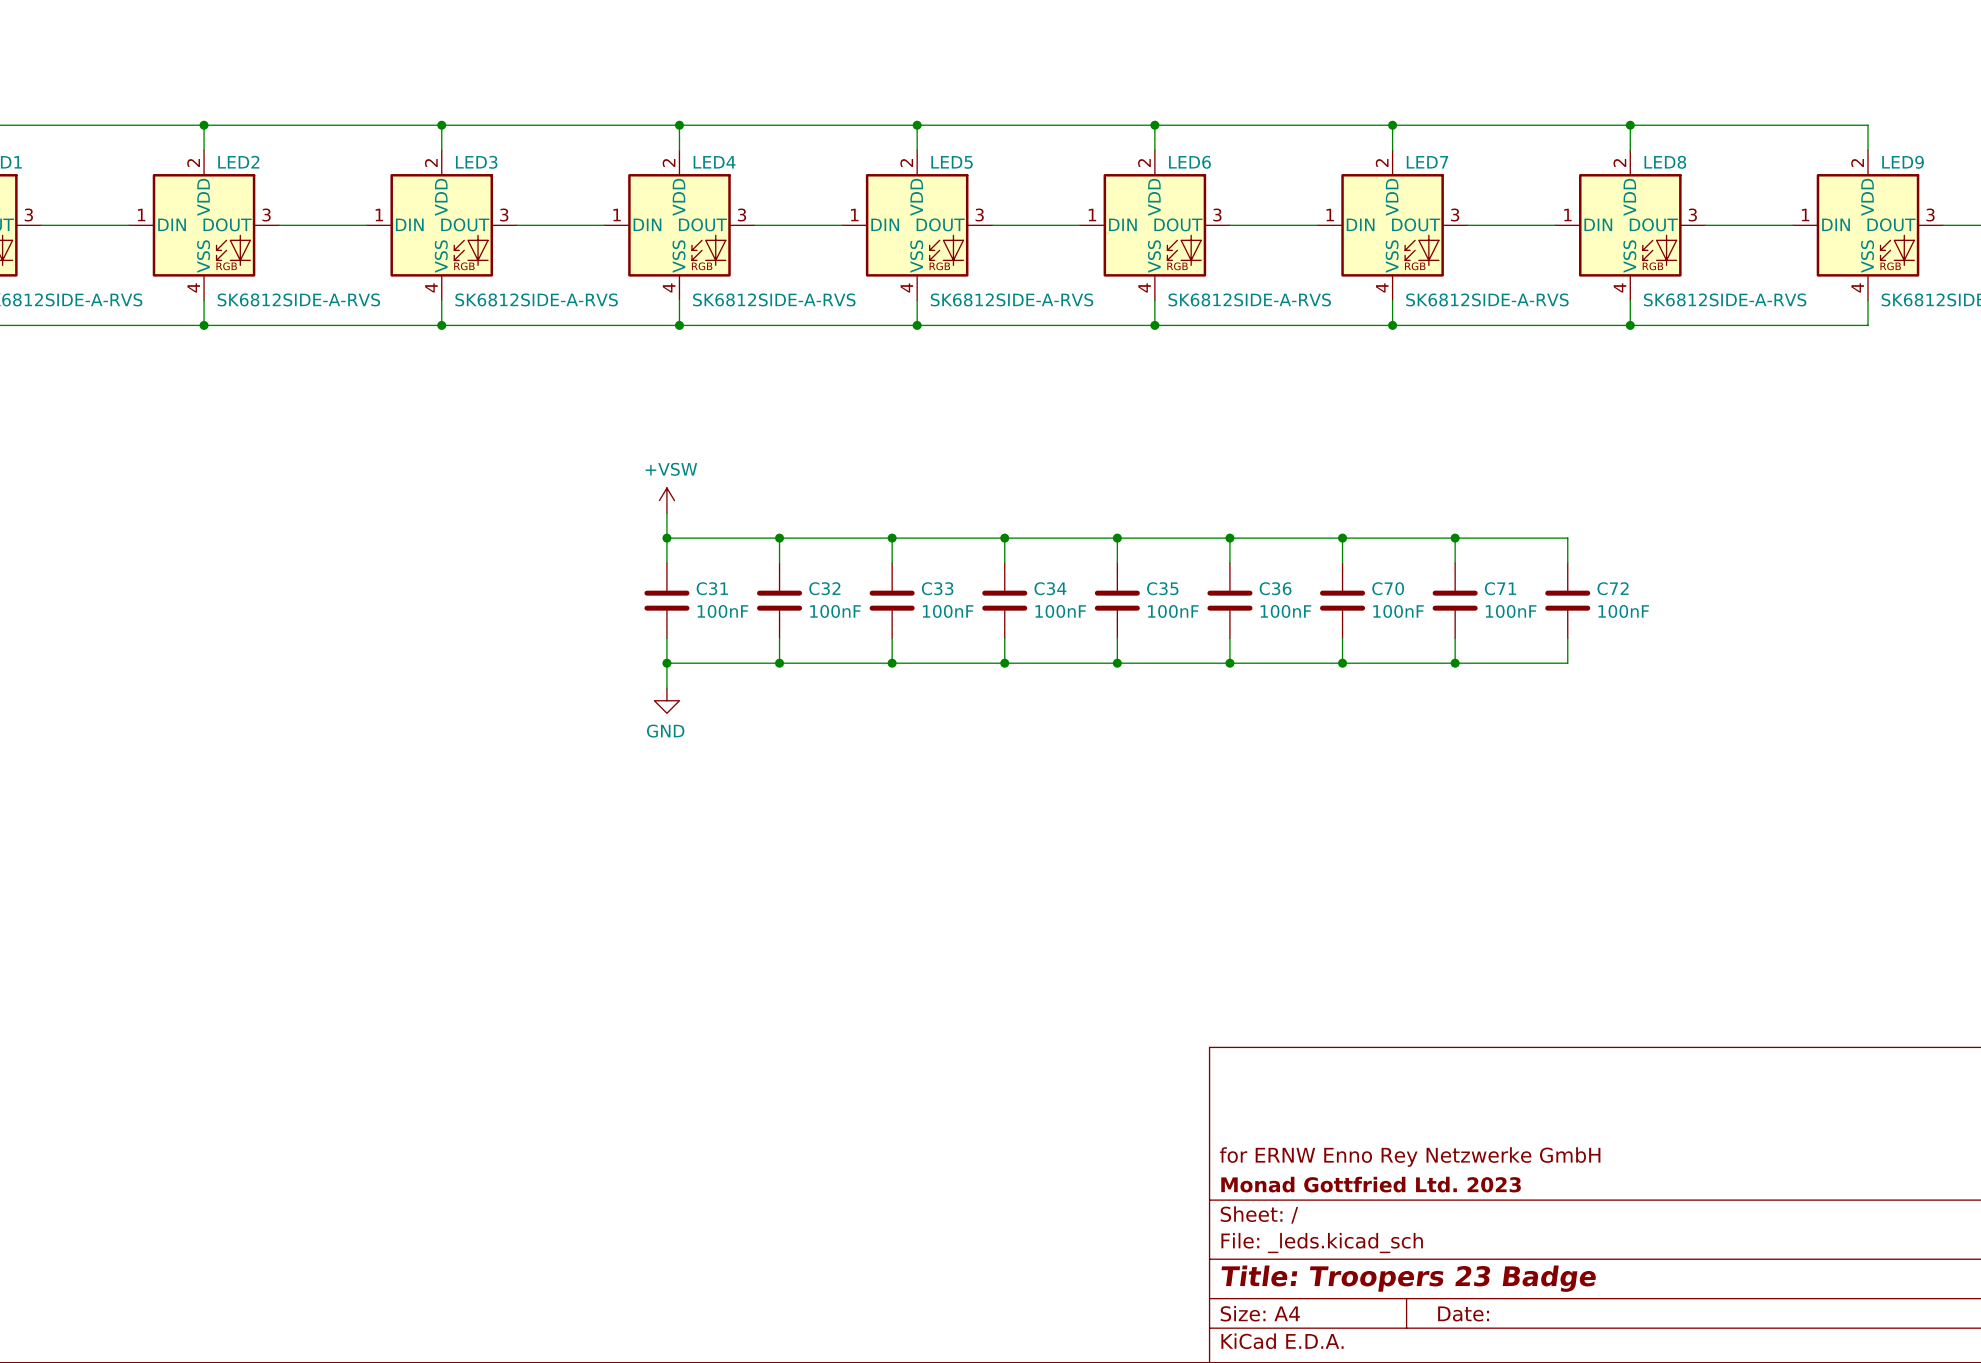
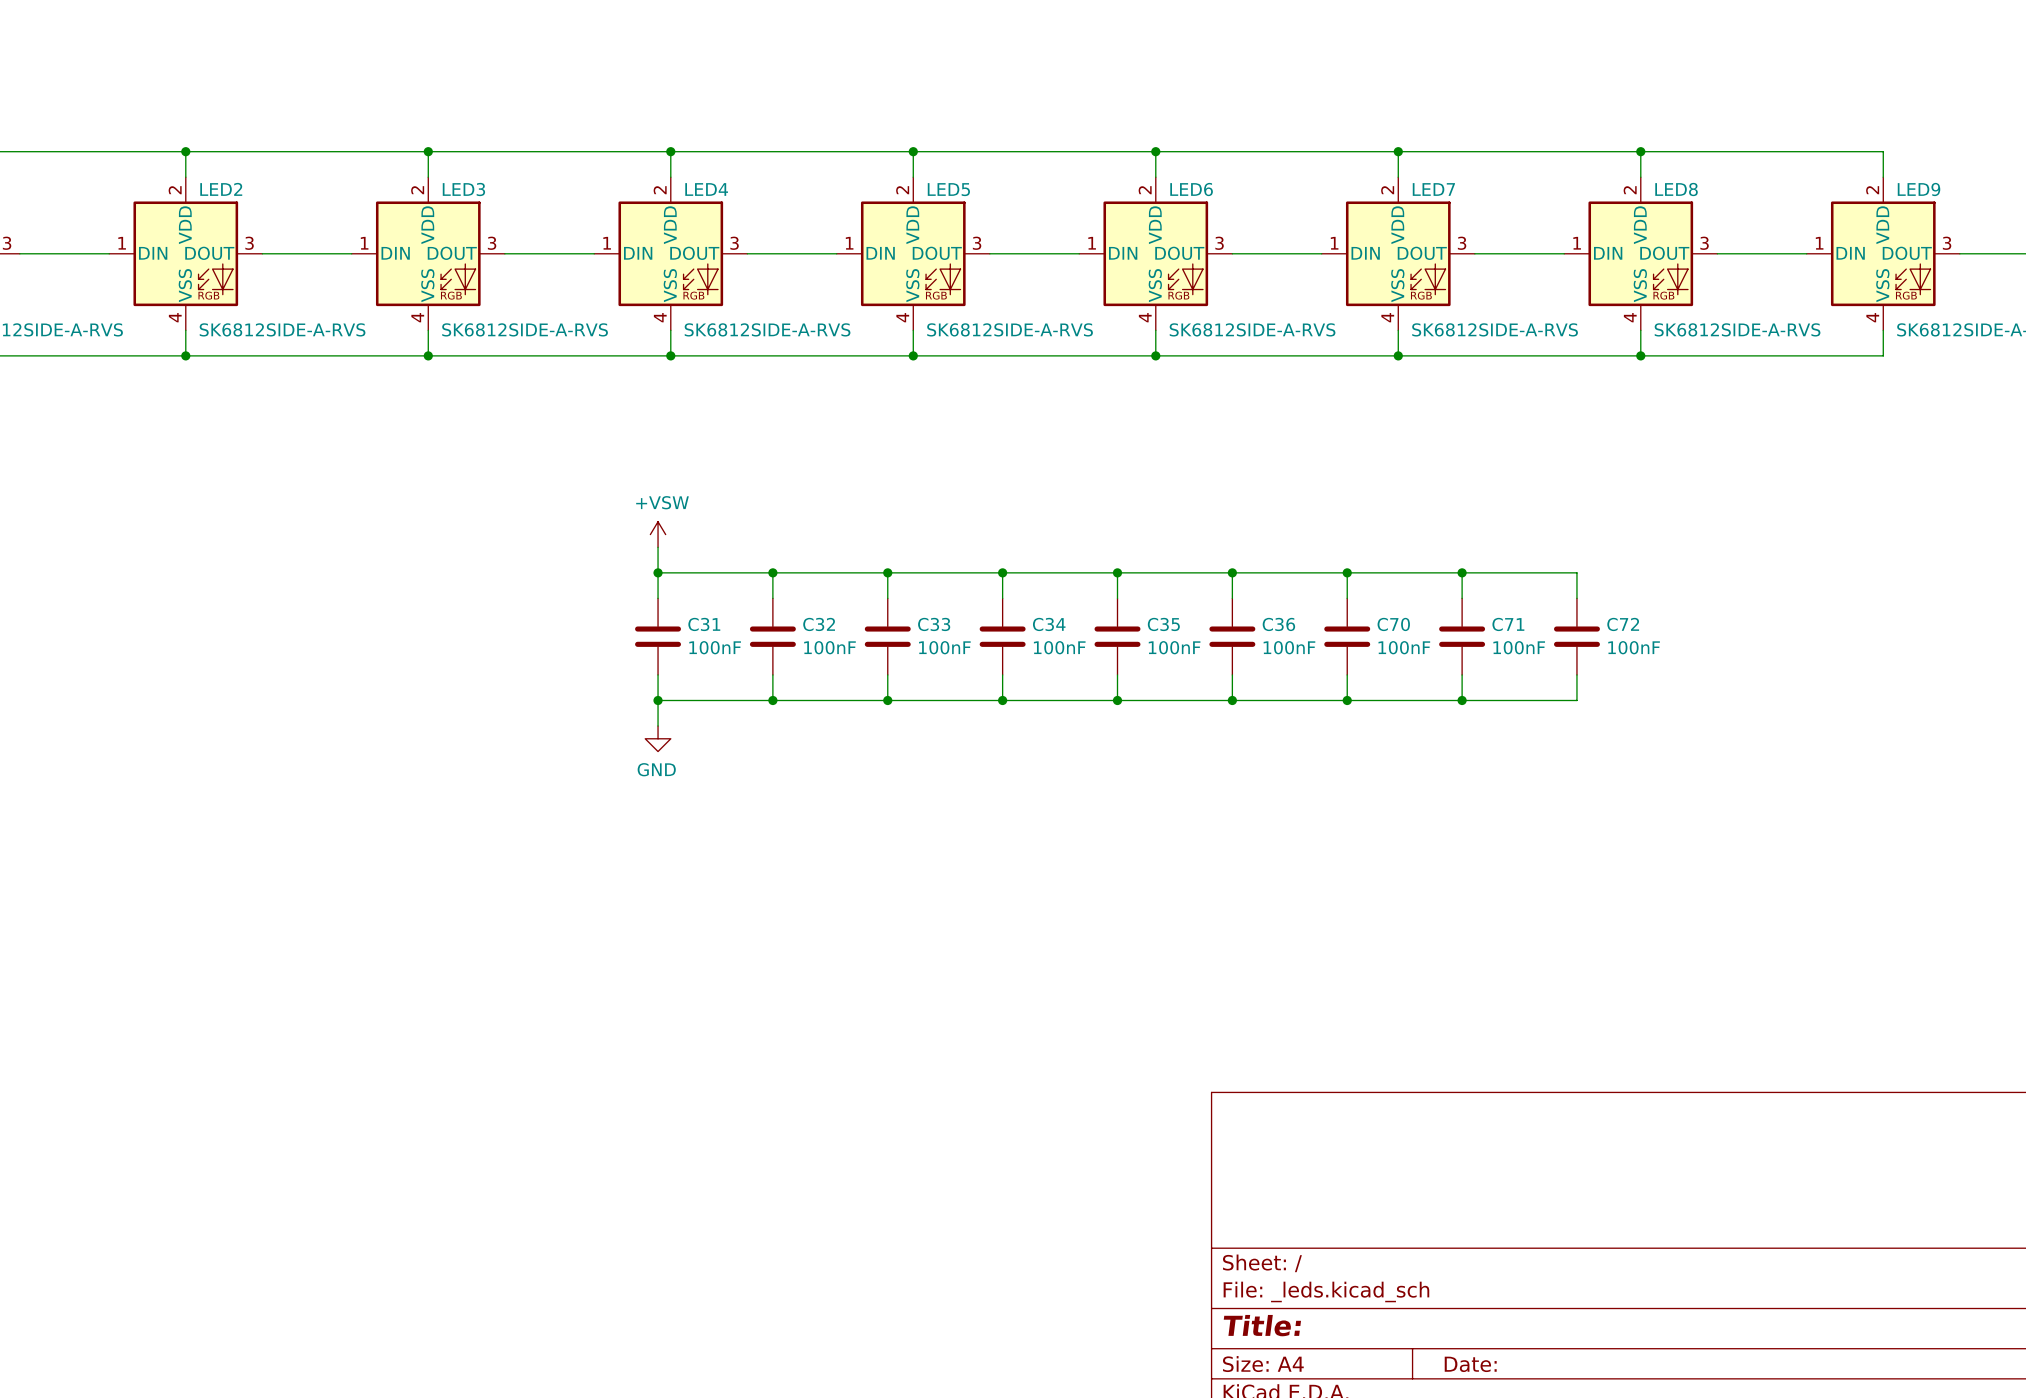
title block: for ERNW Enno Rey Netzwerke GmbH (1410, 1157) -> none
title block: Monad Gottfried Ltd. 2023 (1371, 1184) -> none
title block: Title: Troopers 23 Badge (1408, 1278) -> Title: (1262, 1325)

